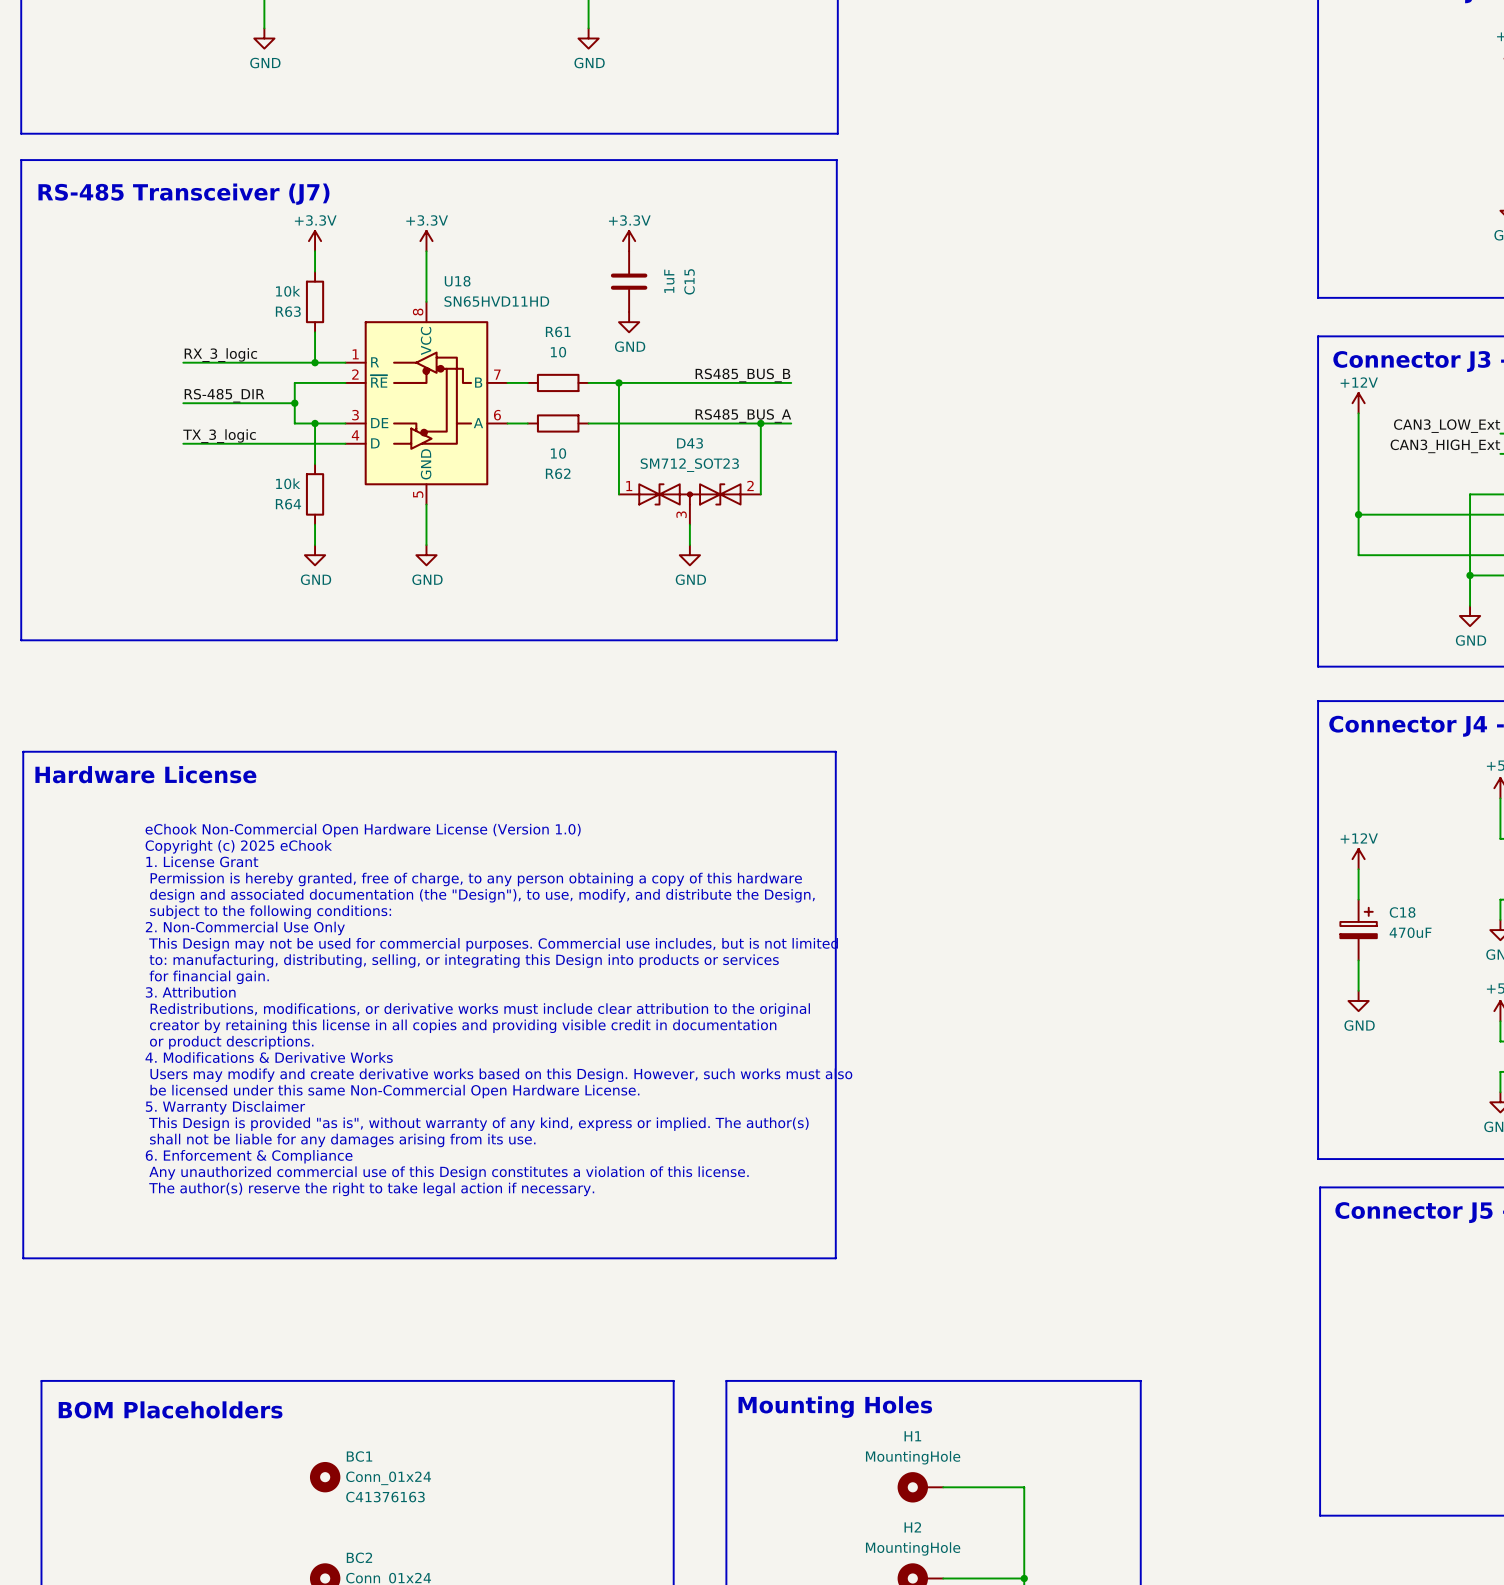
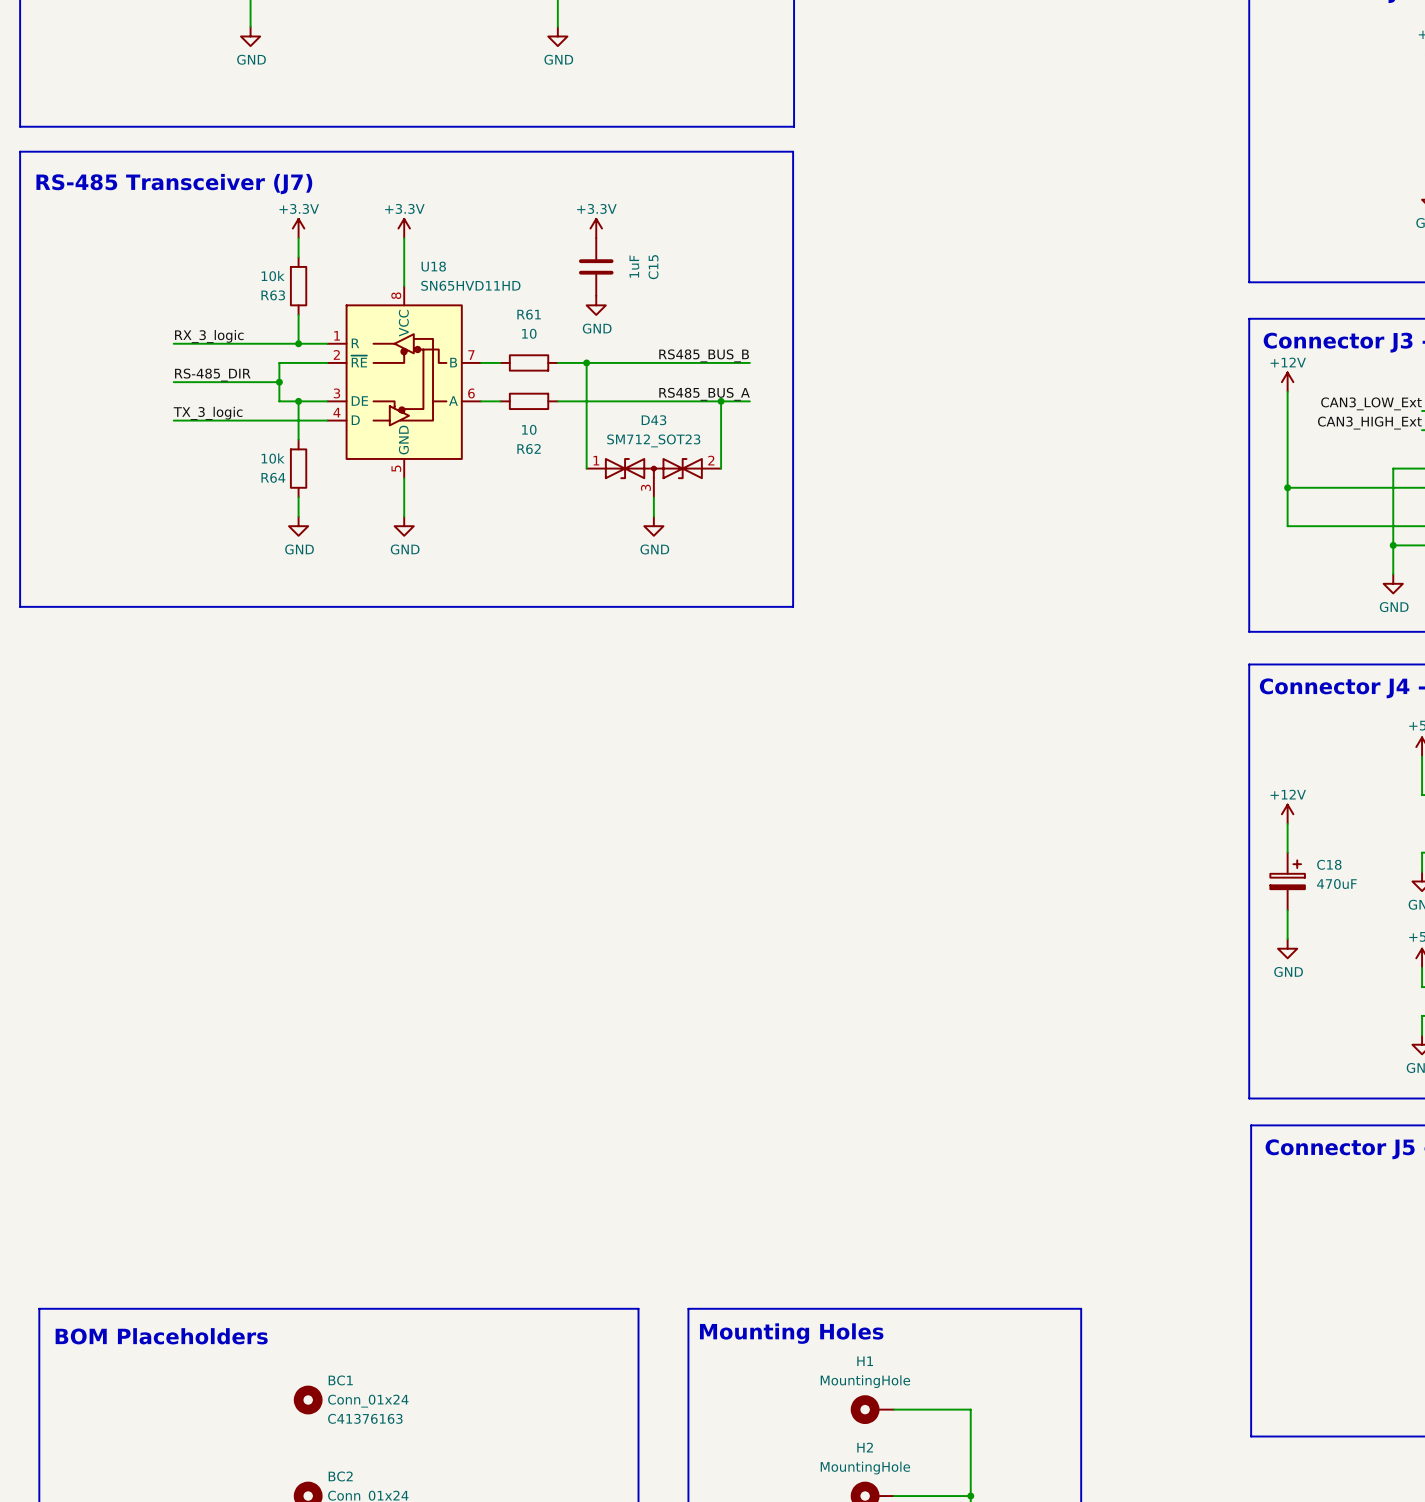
line: (23, 751) (835, 751) (835, 1258) (23, 1258) (23, 751) -> none
text: Hardware License (145, 774) -> none
text: eChook Non-Commercial Open Hardware License (Version 1.0) (363, 830) -> none
text: Copyright (c) 2025 eChook (238, 846) -> none
text: 1. License Grant (202, 861) -> none
text: Permission is hereby granted, free of charge, to any person obtaining a copy of this hardware (476, 879) -> none
text: design and associated documentation (the "Design"), to use, modify, and distribute the Design, (482, 895) -> none
text: subject to the following conditions: (270, 912) -> none
text: 2. Non-Commercial Use Only (245, 928) -> none
text: This Design may not be used for commercial purposes. Commercial use includes, but is not limited (493, 944) -> none
text: to: manufacturing, distributing, selling, or integrating this Design into products or services (464, 961) -> none
text: for financial gain. (209, 977) -> none
text: 3. Attribution (190, 992) -> none
text: Redistributions, modifications, or derivative works must include clear attribution to the original (480, 1009) -> none
text: creator by retaining this license in all copies and providing visible credit in documentation (463, 1026) -> none
text: or product descriptions. (231, 1042) -> none
text: 4. Modifications & Derivative Works (269, 1057) -> none
text: Users may modify and create derivative works based on this Design. However, such works must also (501, 1075) -> none
text: be licensed under this same Non-Commercial Open Hardware License. (394, 1091) -> none
text: 5. Warranty Disclaimer (225, 1107) -> none
text: This Design is provided "as is", without warranty of any kind, express or implied. The author(s) (478, 1124) -> none
text: shall not be liable for any damages arising from its use. (342, 1140) -> none
text: 6. Enforcement & Compliance (249, 1156) -> none
text: Any unauthorized commercial use of this Design constitutes a violation of this license. (449, 1173) -> none
text: The author(s) reserve the right to take legal action if necessary. (371, 1189) -> none

